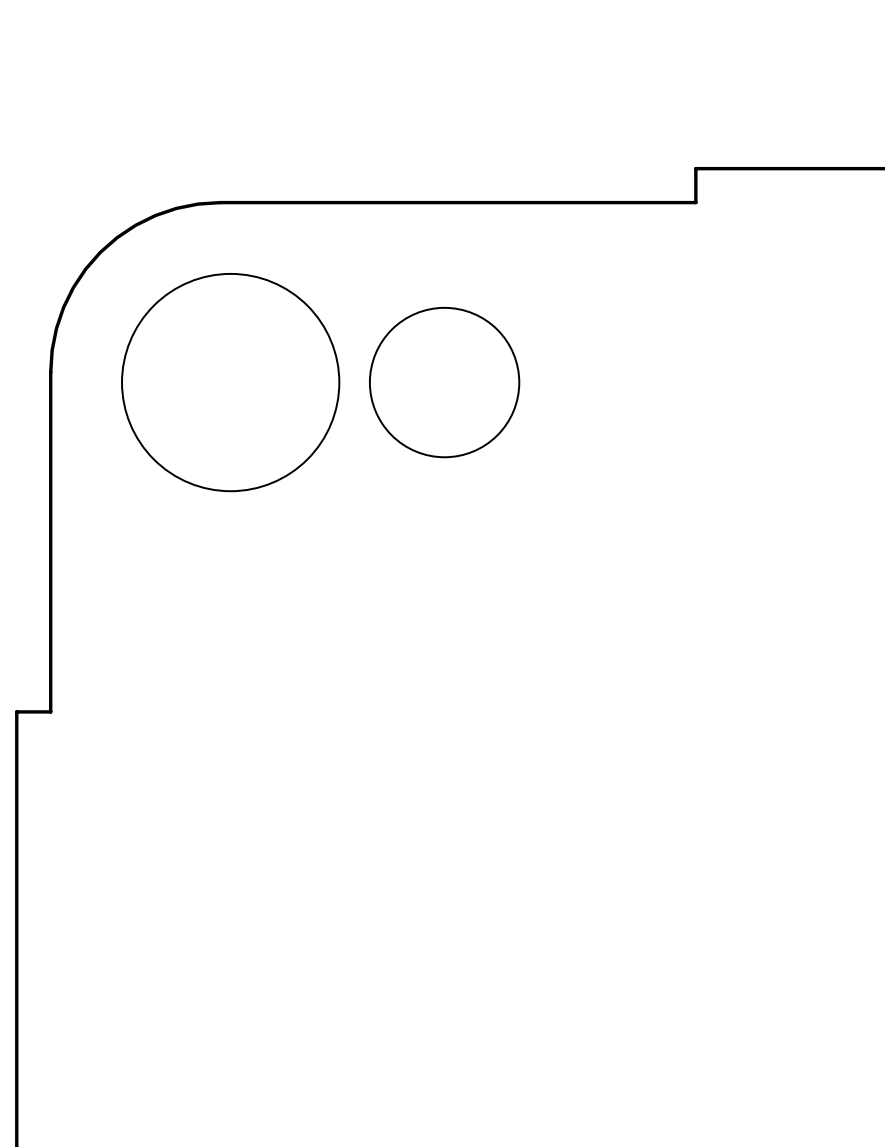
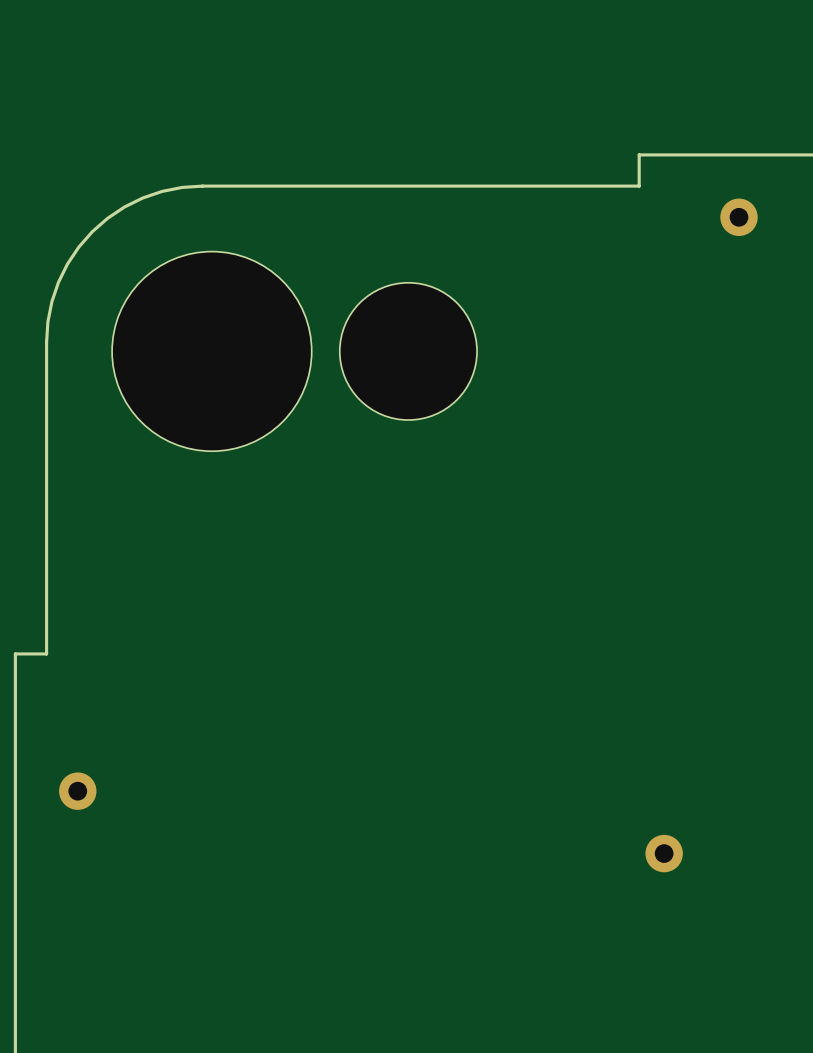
via: none -> (739, 217)
via: none -> (77, 791)
via: none -> (664, 853)

